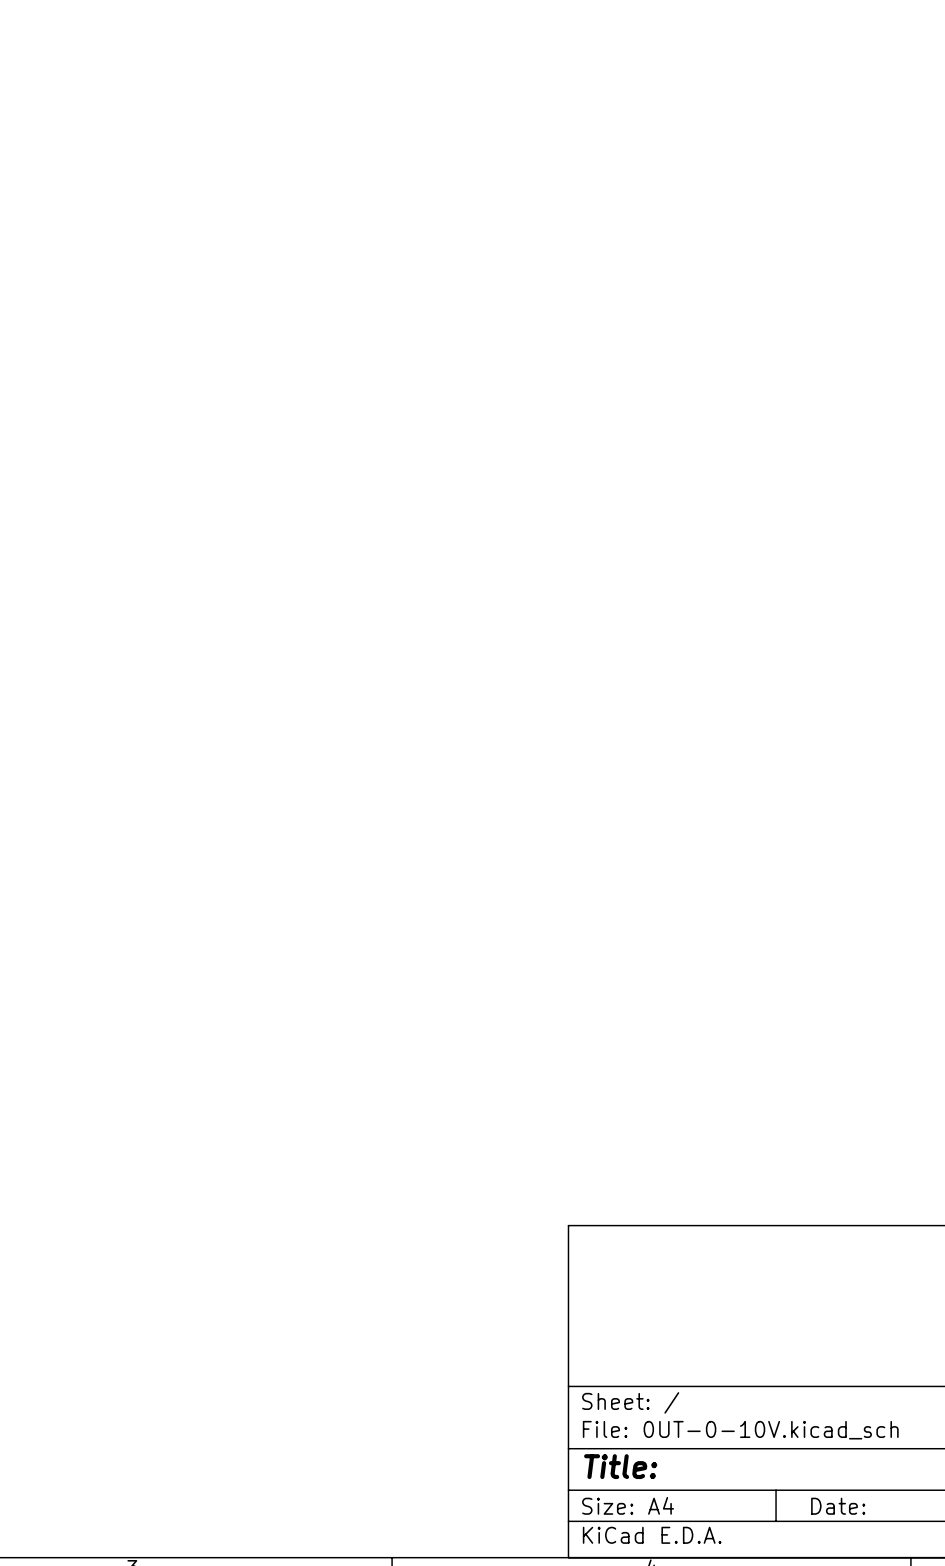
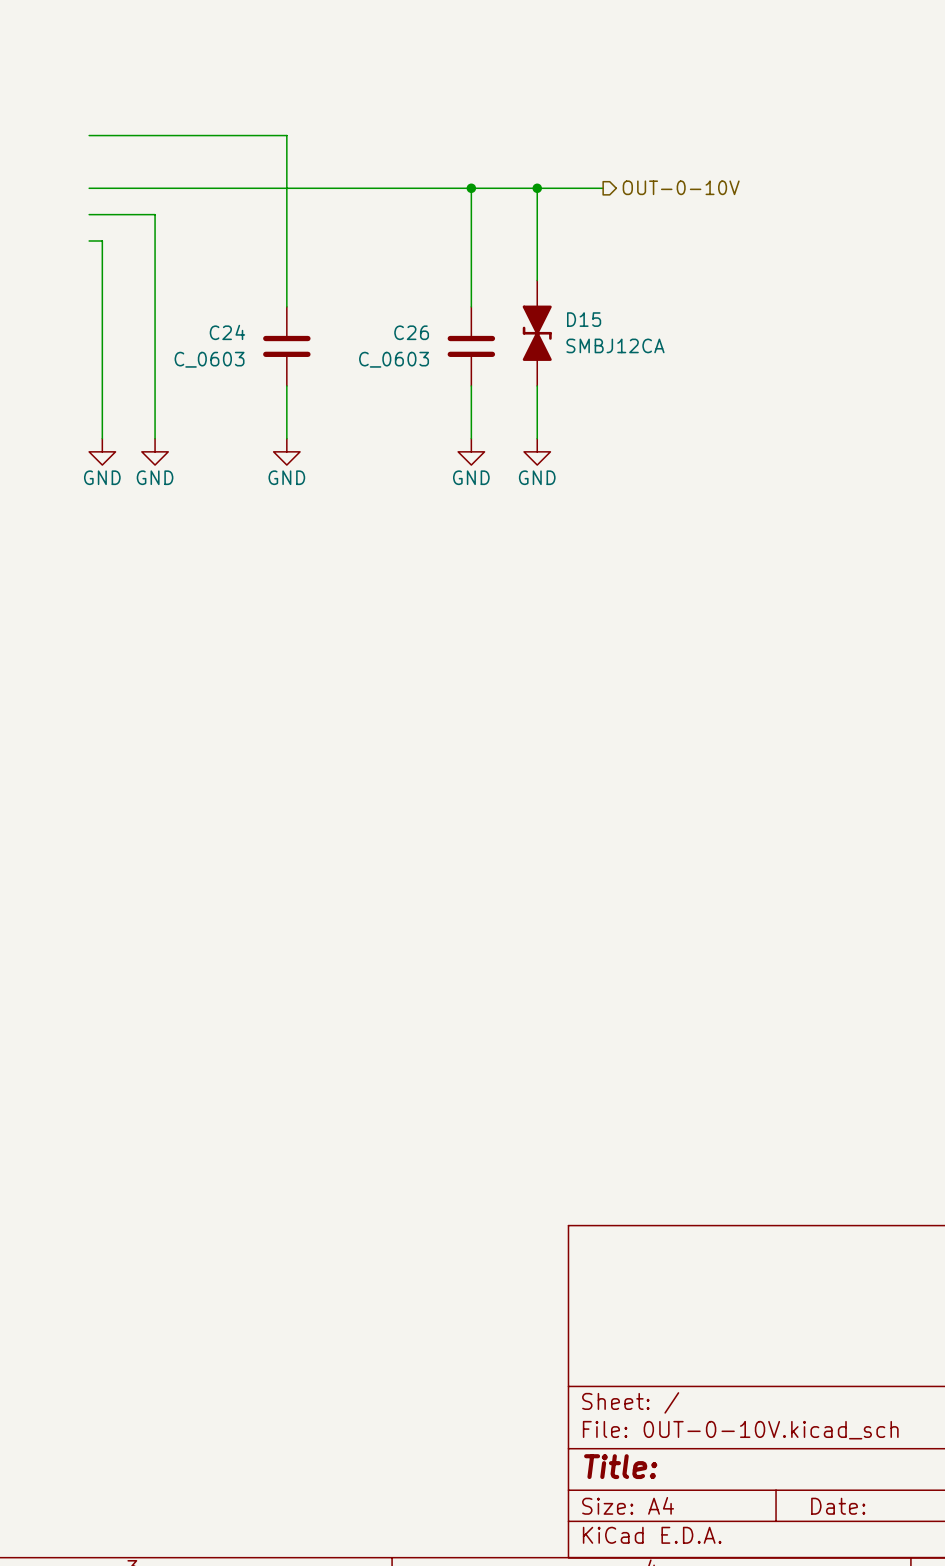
wire: none -> (89, 135) (286, 135) (286, 306)
hierarchical label: none -> OUT-0-10V (681, 187)
wire: none -> (89, 188) (603, 188)
wire: none -> (471, 188) (471, 306)
junction: none -> (471, 188)
wire: none -> (537, 188) (537, 280)
junction: none -> (537, 188)
wire: none -> (89, 214) (155, 214) (155, 438)
wire: none -> (89, 240) (102, 240) (102, 438)
D15: none -> SMBJ12CA (537, 333)
C24: none -> C_0603 (286, 346)
C26: none -> C_0603 (471, 346)
wire: none -> (286, 385) (286, 438)
wire: none -> (471, 385) (471, 438)
wire: none -> (537, 385) (537, 438)
power symbol: none -> GND (102, 451)
power symbol: none -> GND (155, 451)
power symbol: none -> GND (286, 451)
power symbol: none -> GND (471, 451)
power symbol: none -> GND (537, 451)

